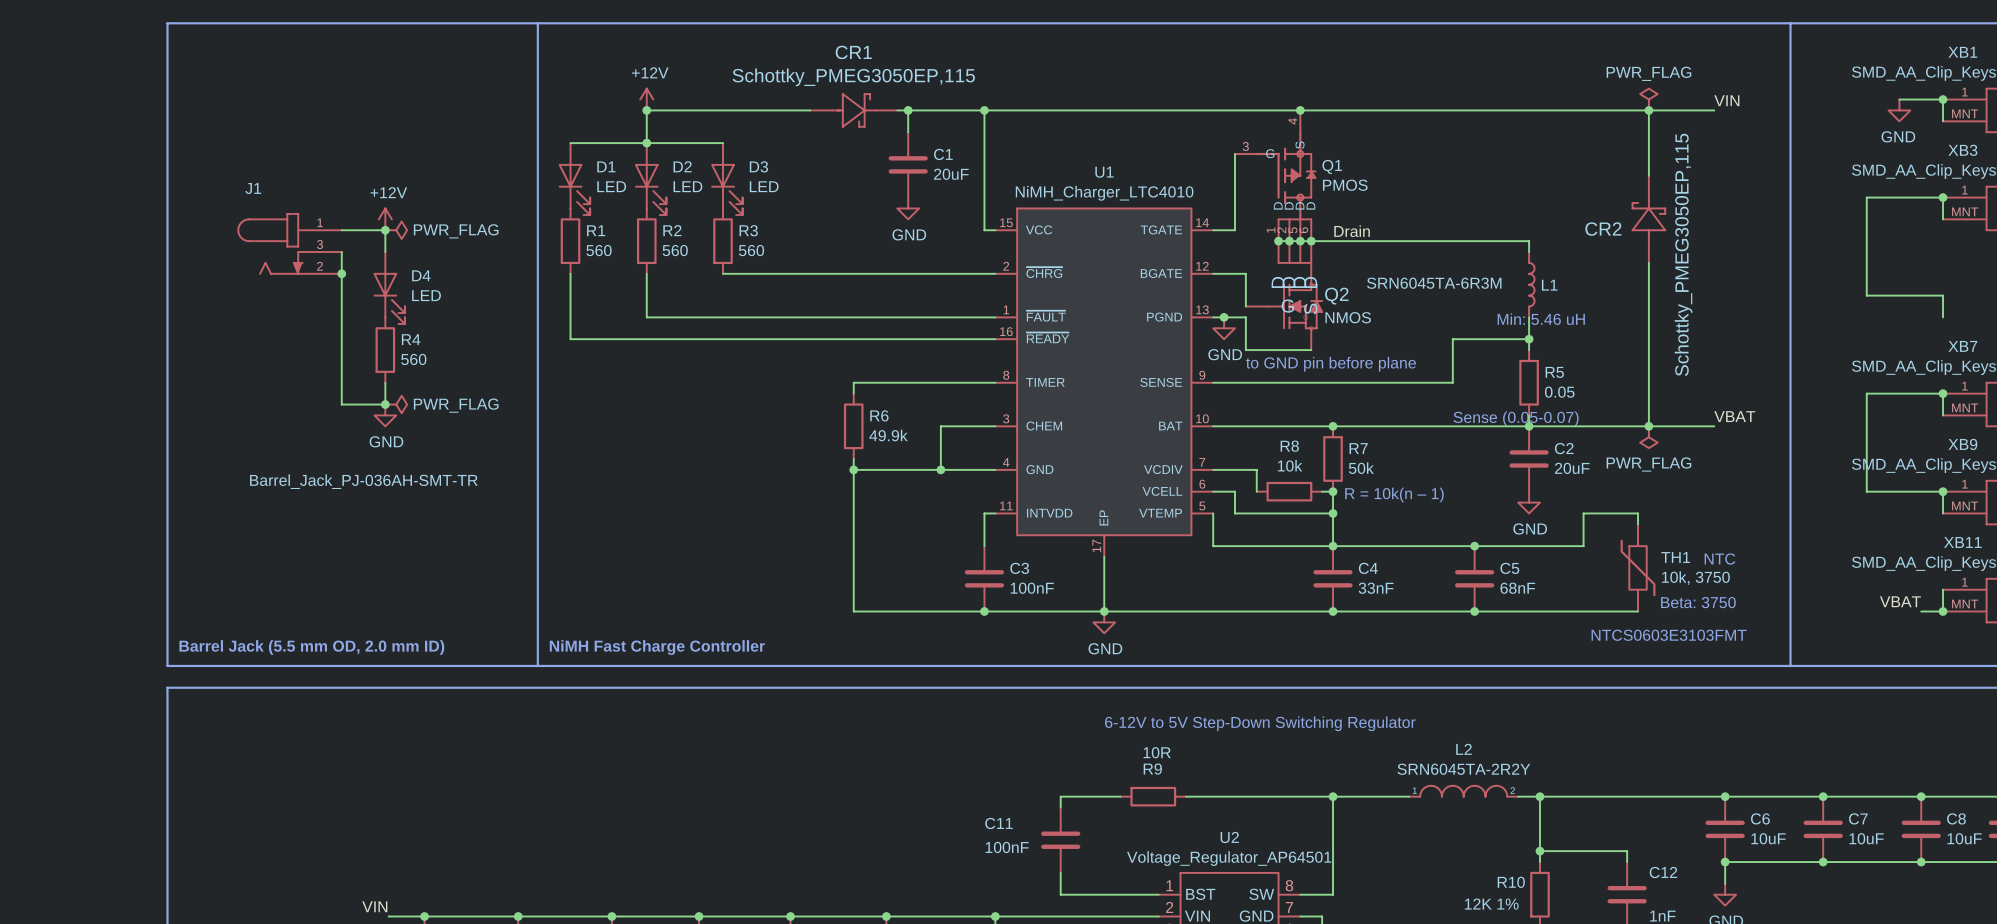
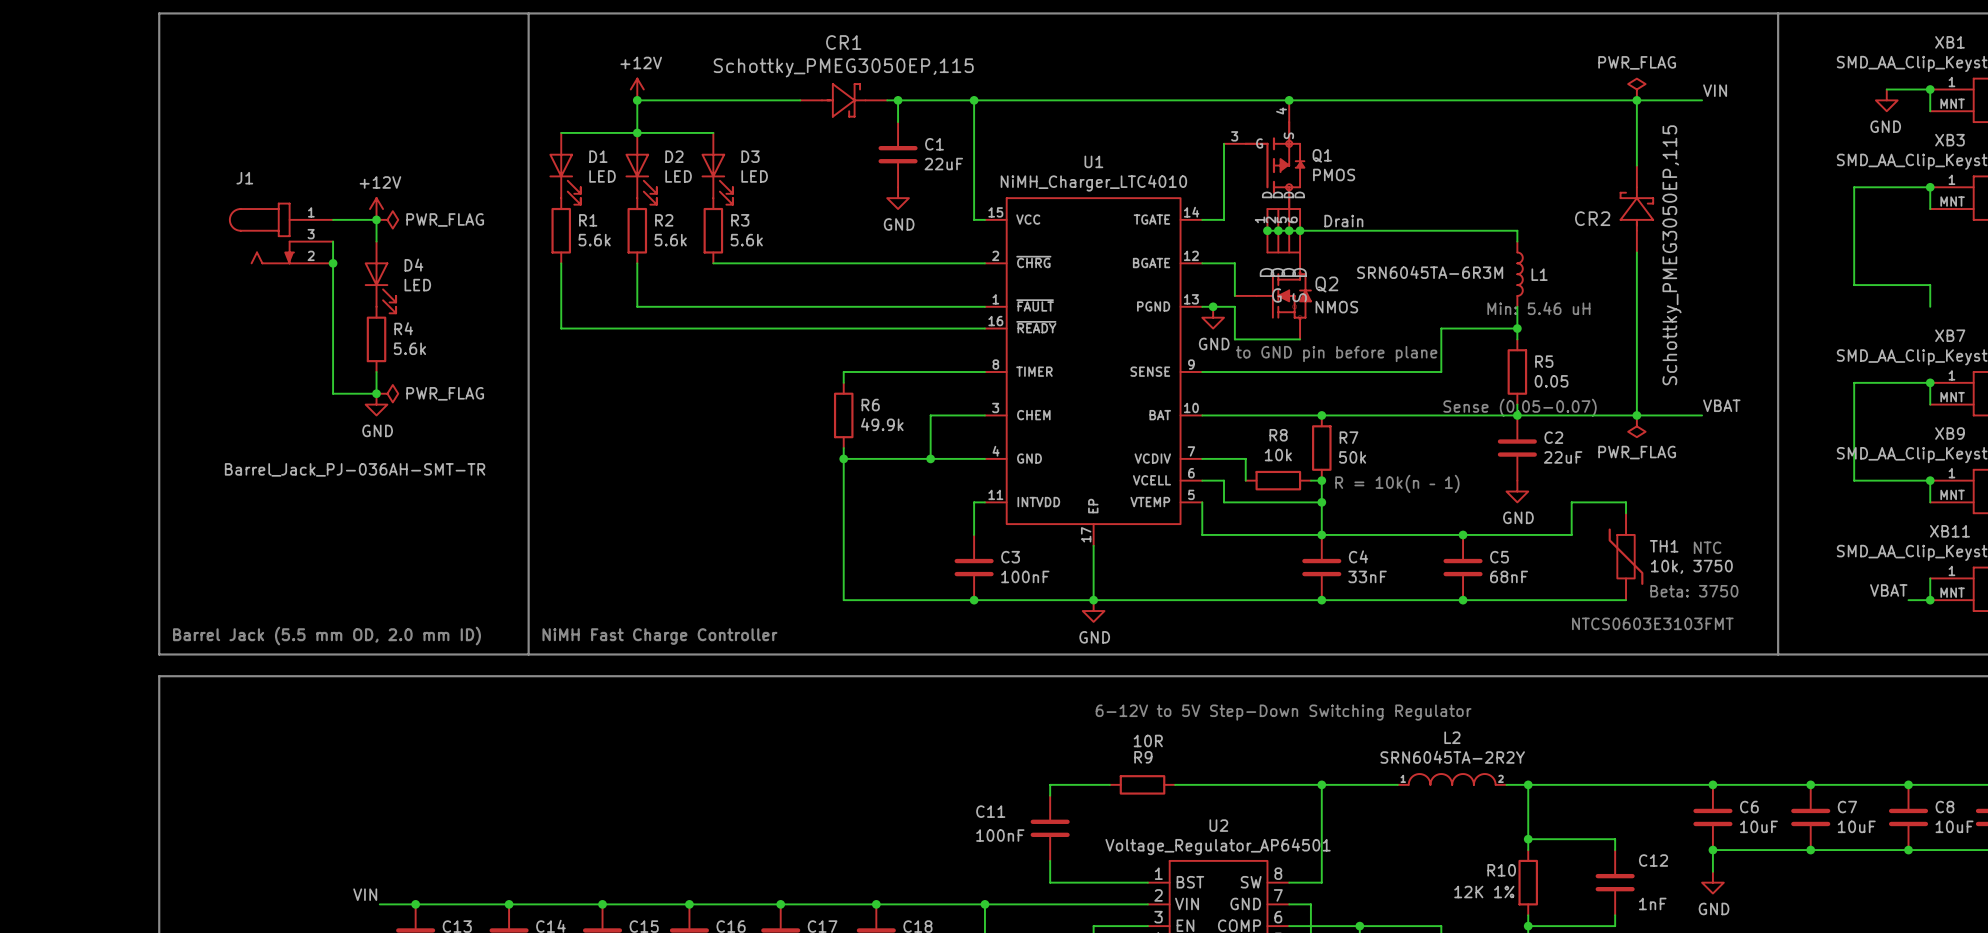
C1 value: 20uF (951, 174) -> 22uF (943, 164)
R1 value: 560 (598, 250) -> 5.6k (594, 240)
R2 value: 560 (675, 250) -> 5.6k (670, 240)
R3 value: 560 (751, 250) -> 5.6k (746, 240)
R4 value: 560 (413, 359) -> 5.6k (409, 348)
C2 value: 20uF (1572, 468) -> 22uF (1563, 457)

